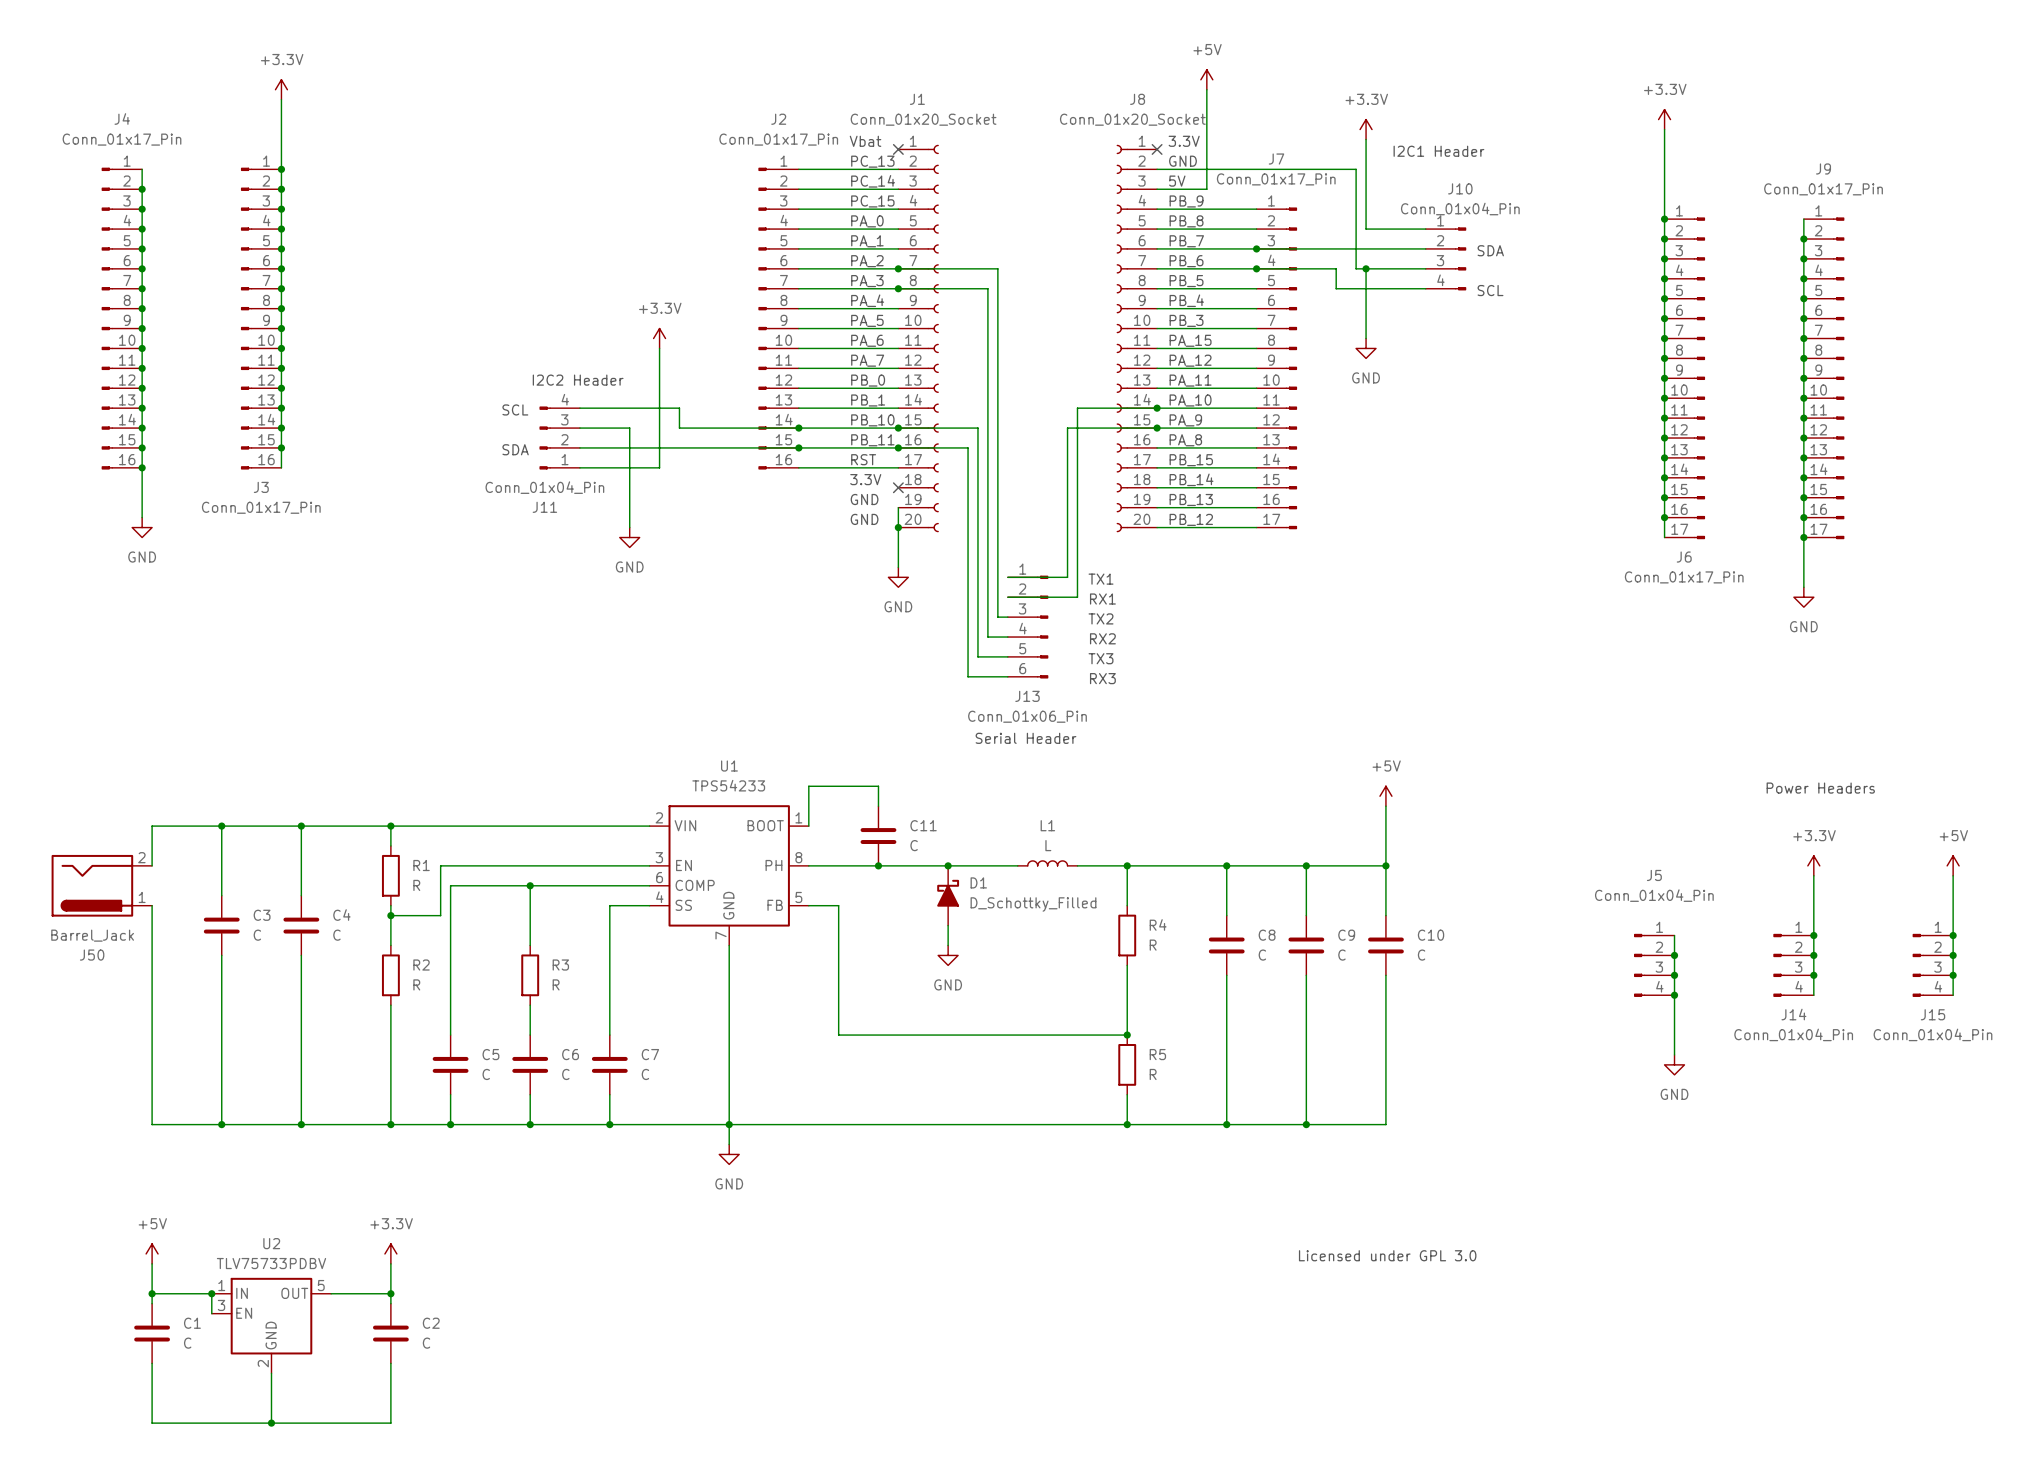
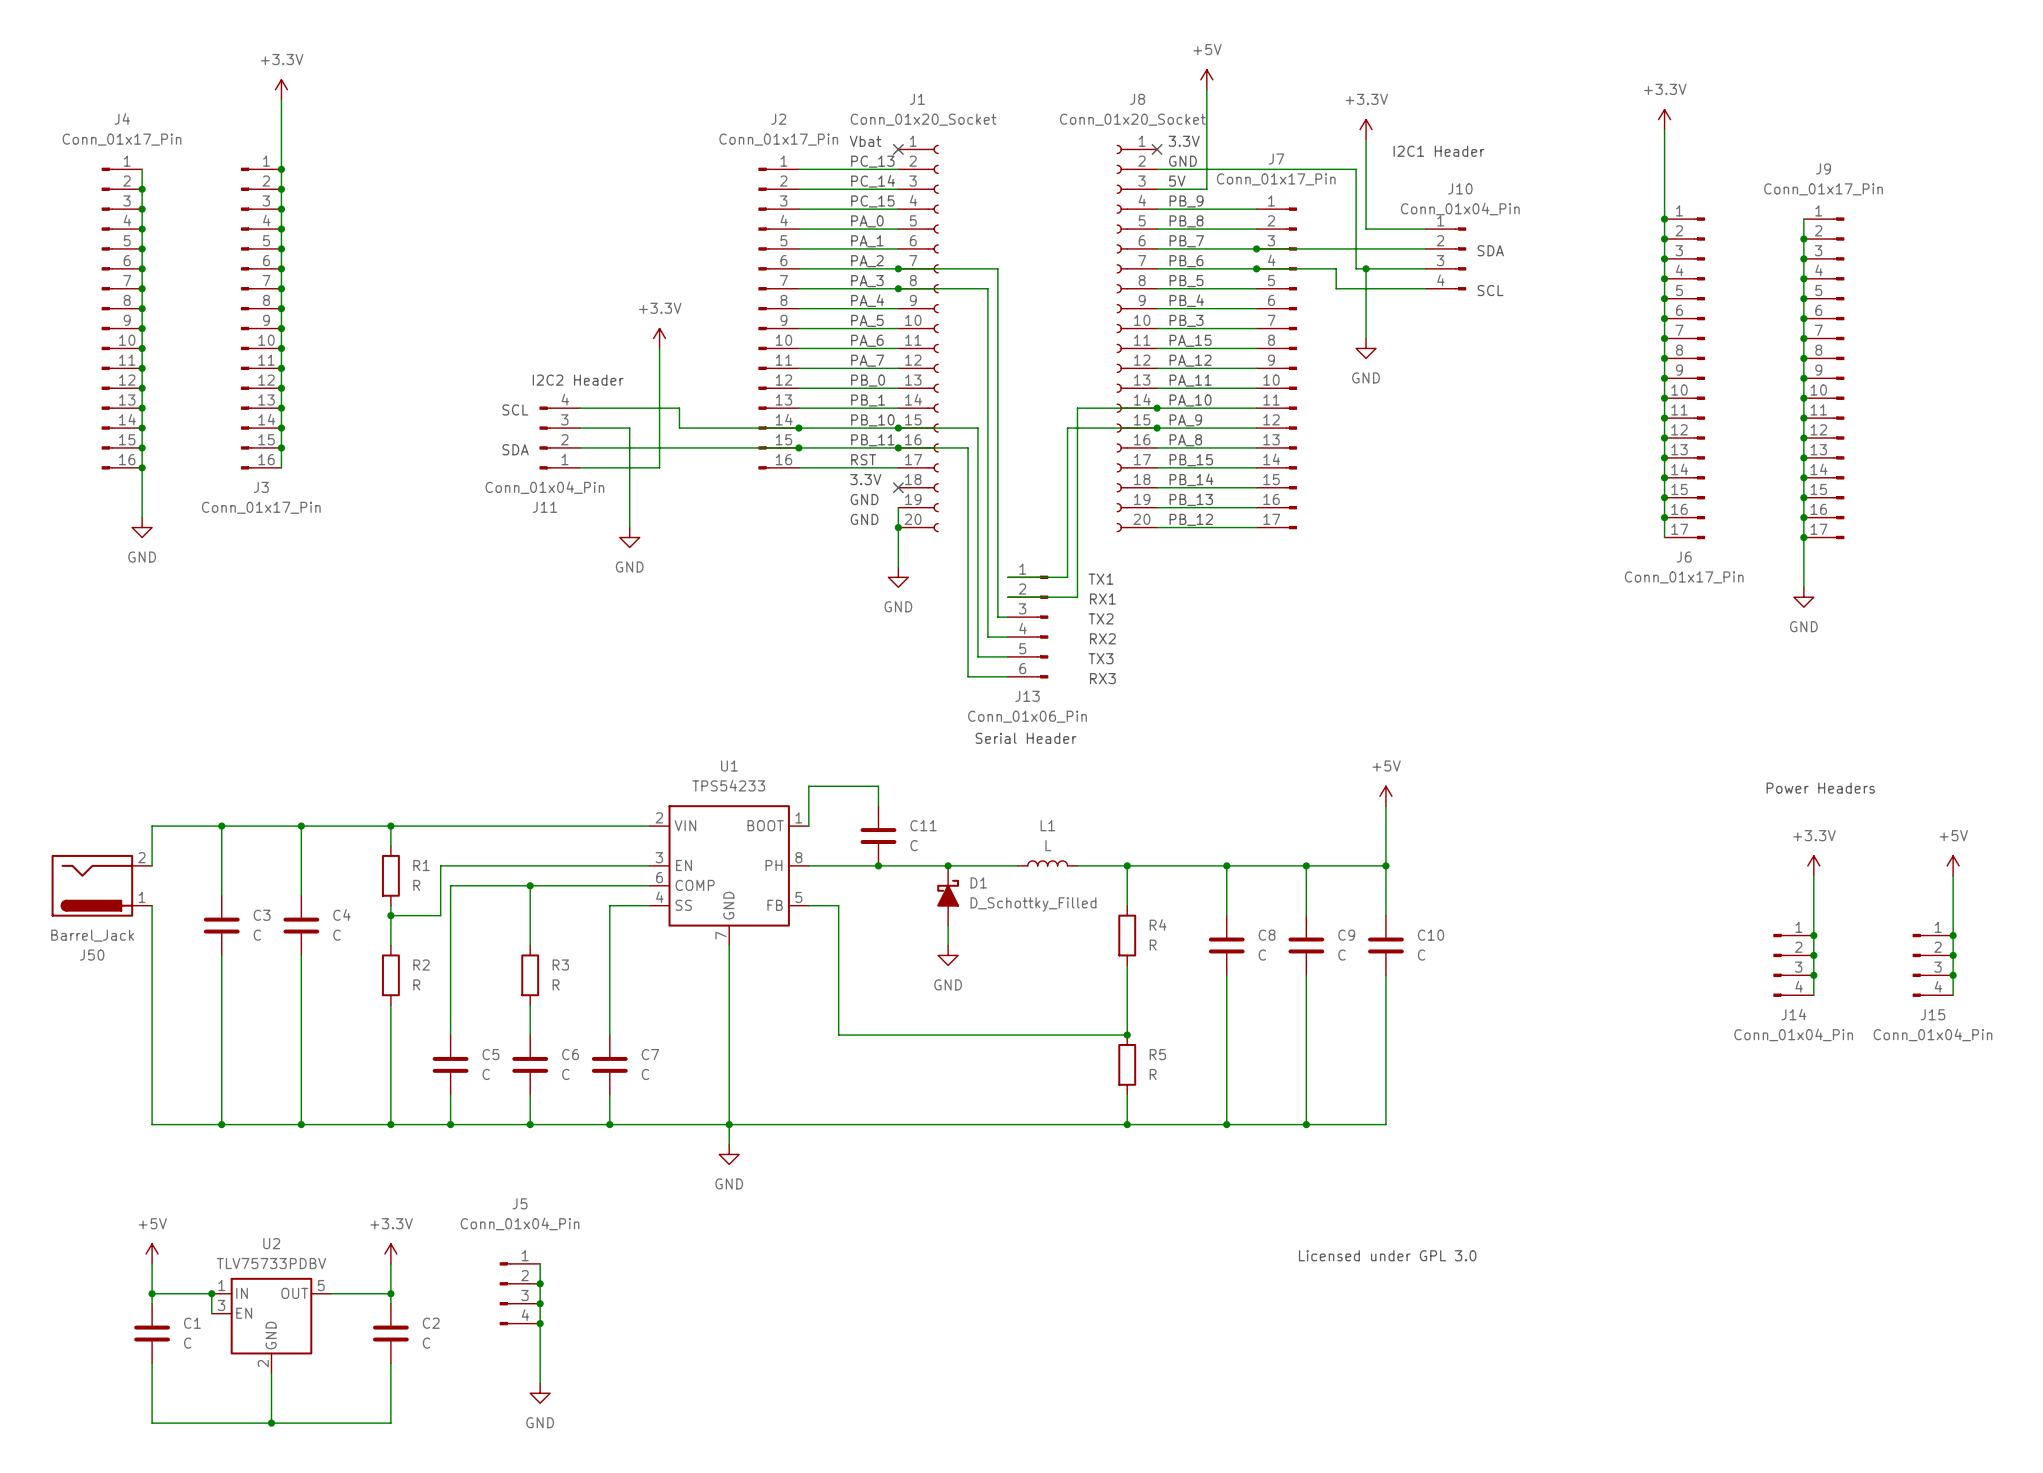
wire: (1674, 935) (1674, 1054) -> none
junction: (1674, 955) -> none
J5 position: (1654, 965) -> (519, 1293)
junction: (1674, 975) -> none
junction: (1674, 995) -> none
power symbol: GND (1674, 1064) -> none
wire: none -> (540, 1263) (540, 1383)
junction: none -> (540, 1283)
junction: none -> (540, 1303)
junction: none -> (540, 1323)
power symbol: none -> GND (540, 1393)

